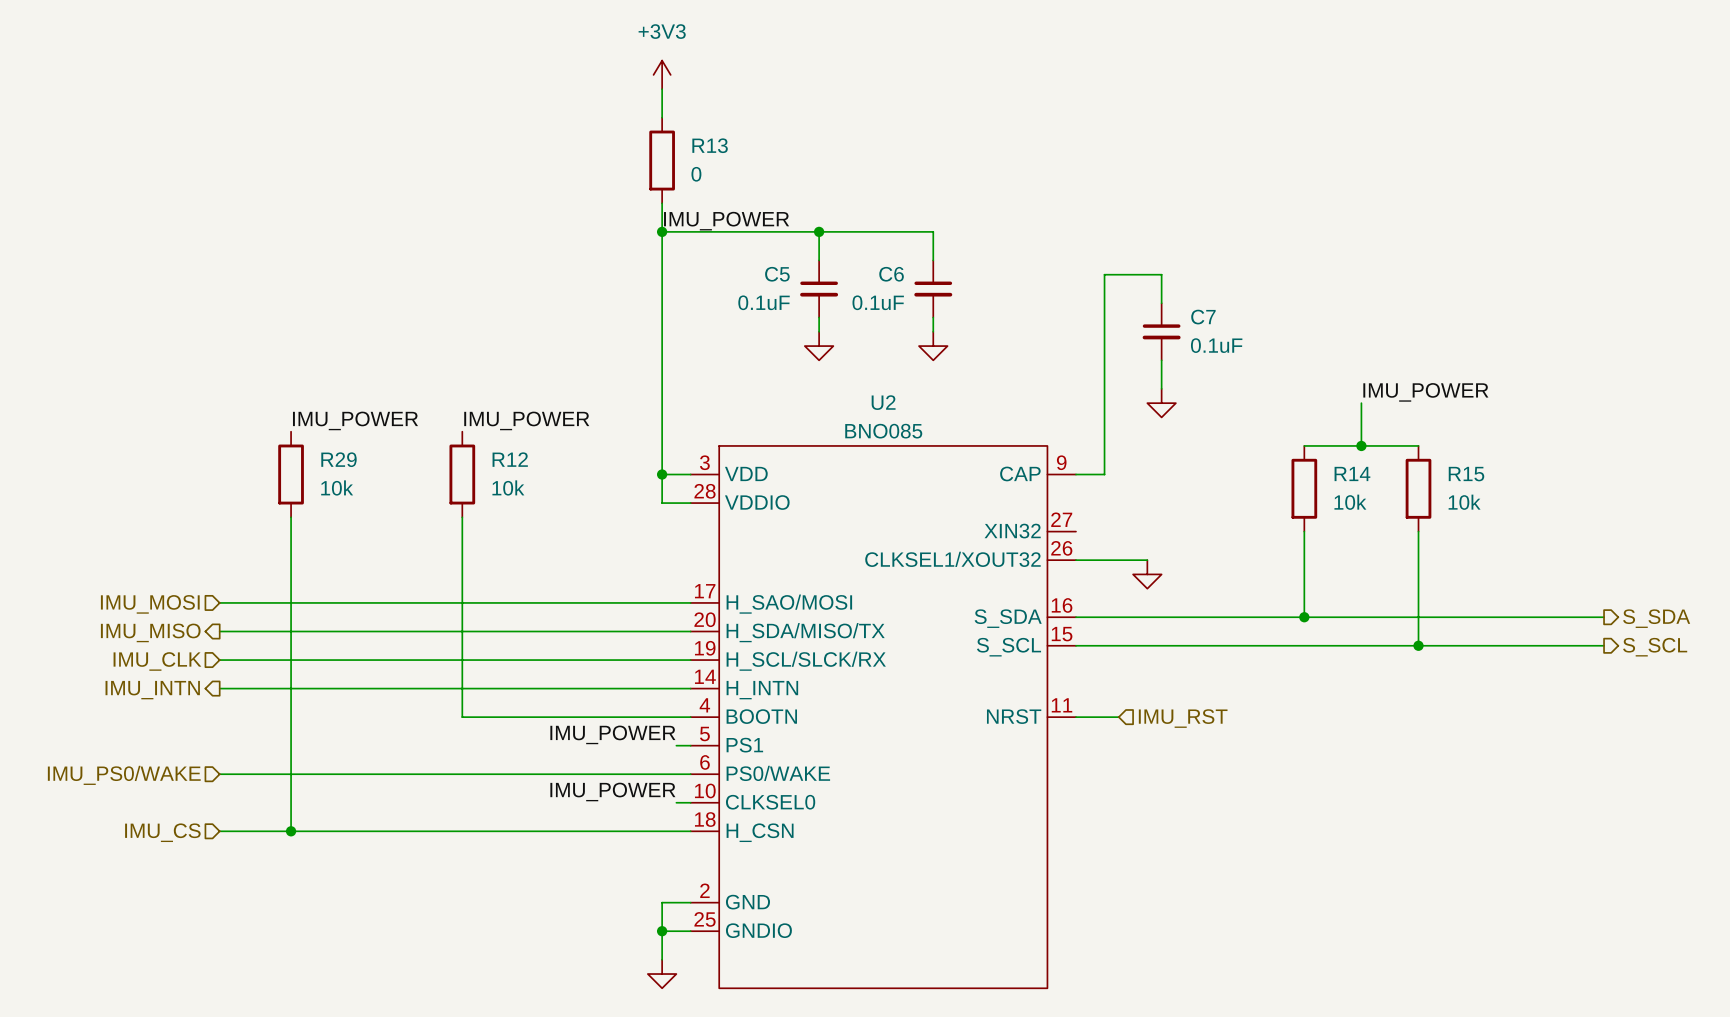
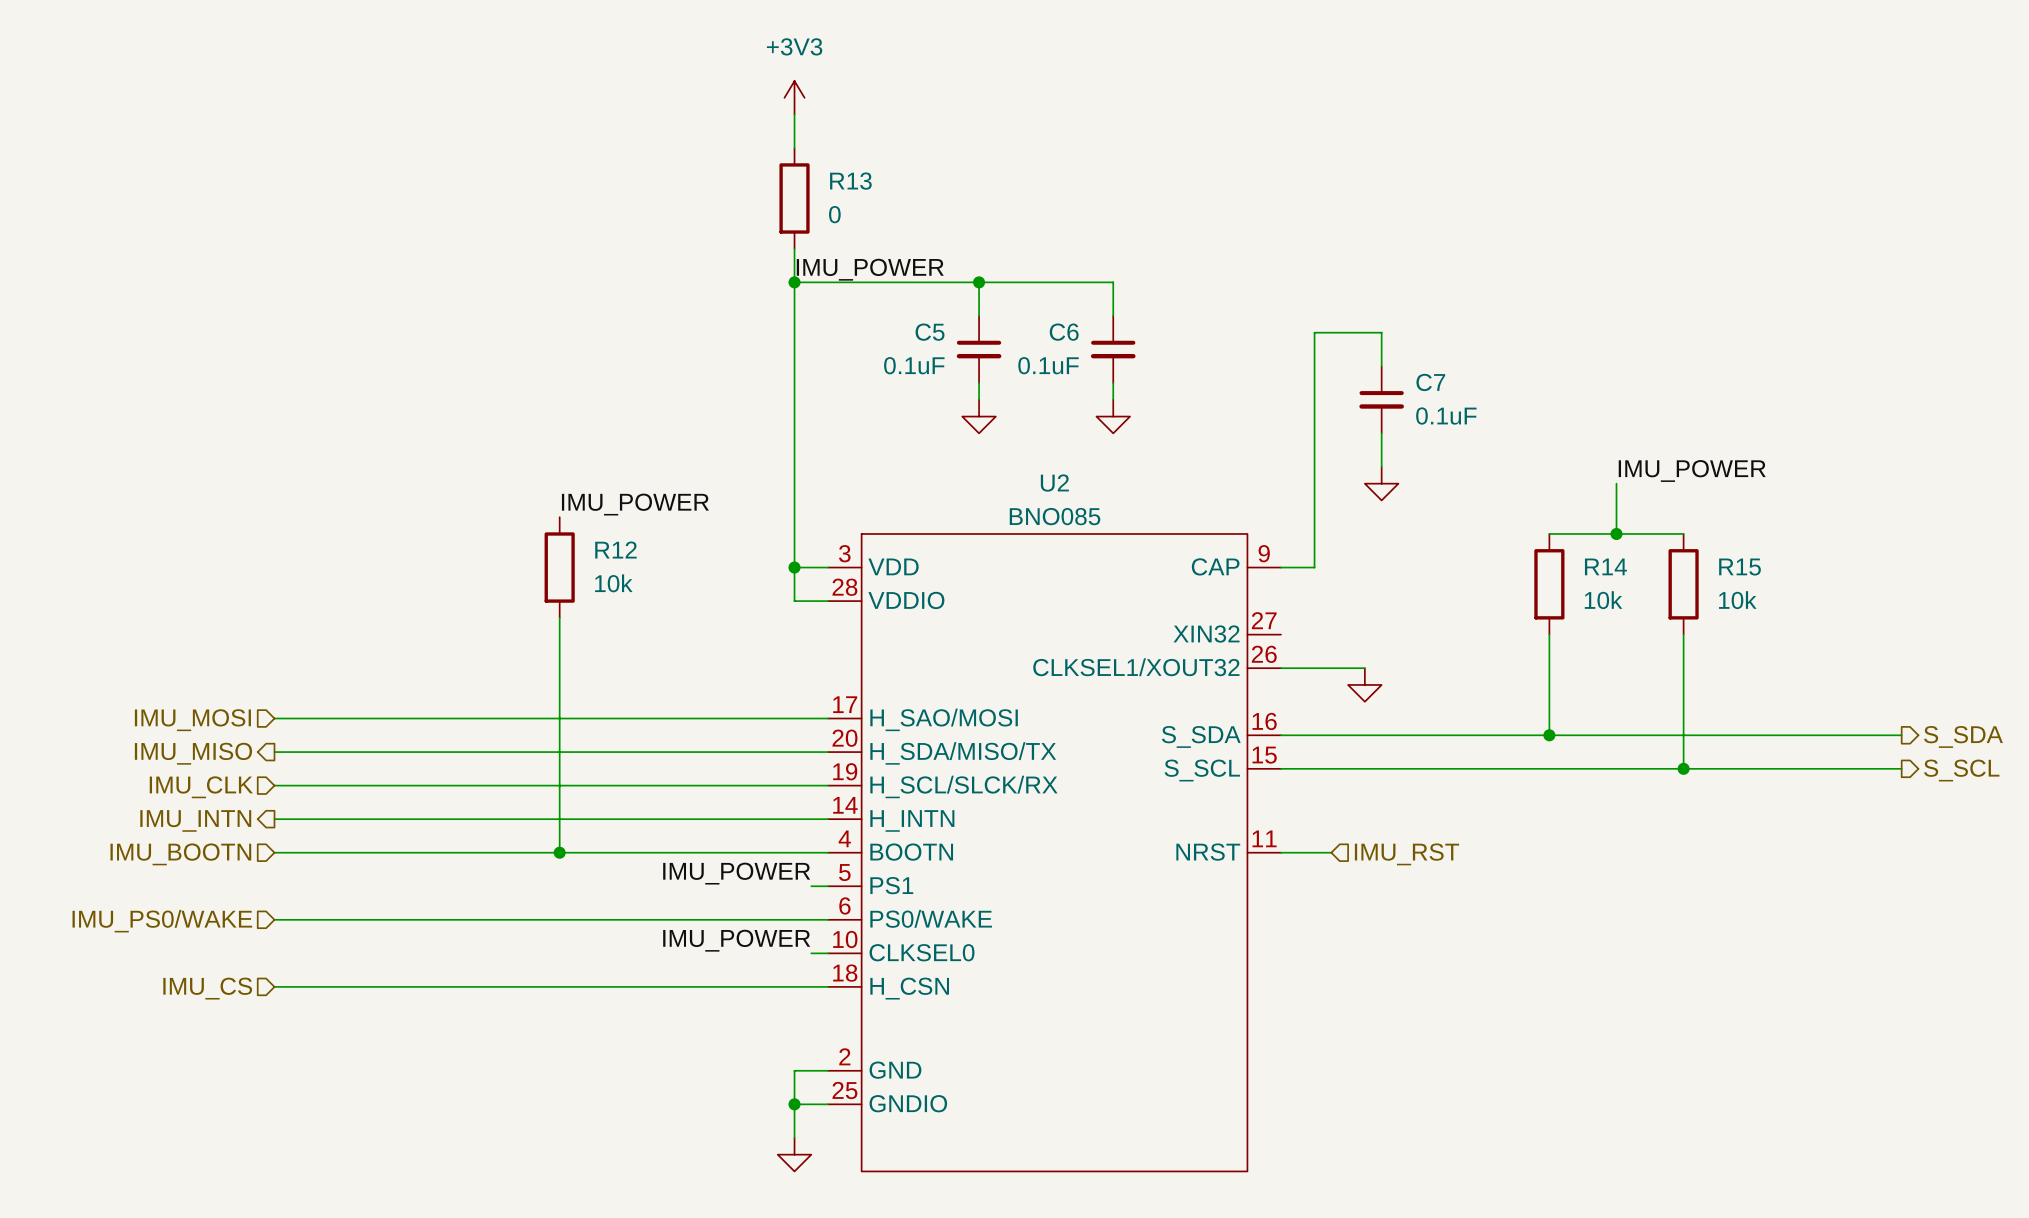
label: IMU_POWER (355, 420) -> none
R29: 10k (291, 474) -> none
wire: (291, 517) (291, 831) -> none
wire: none -> (274, 852) (559, 852)
junction: none -> (559, 852)
hierarchical label: none -> IMU_BOOTN (180, 854)
junction: (291, 831) -> none

